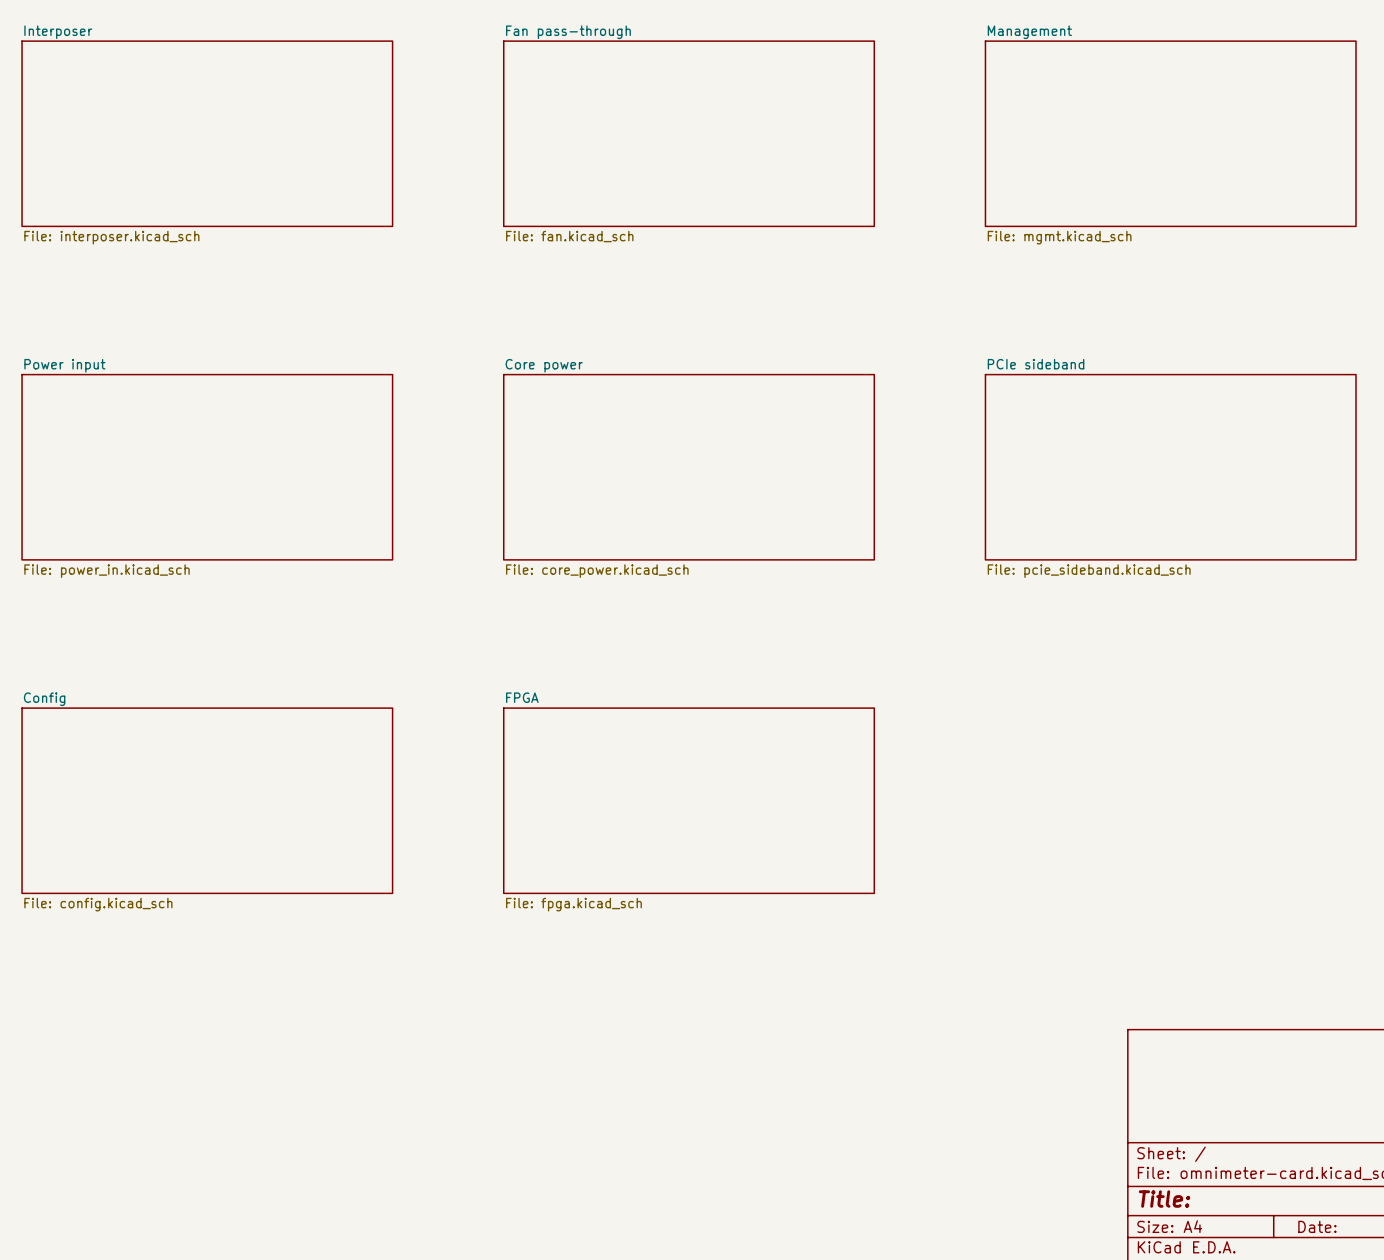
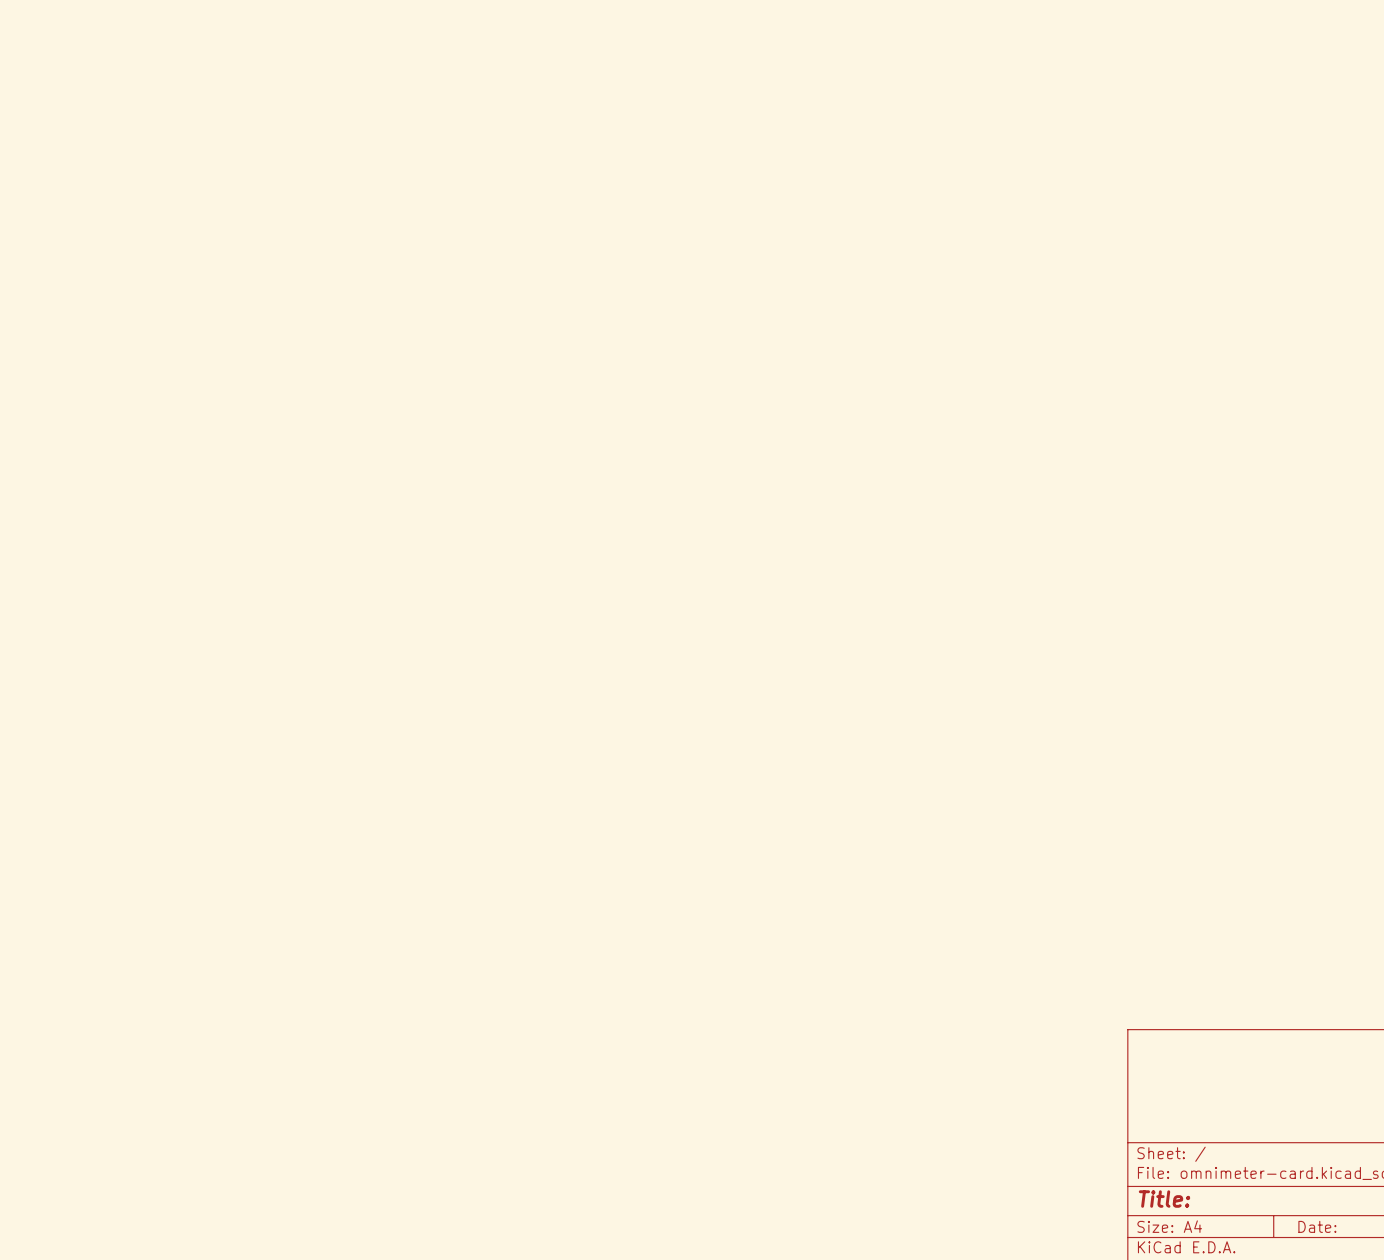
sheet Interposer: File: interposer.kicad_sch (207, 133) -> none
sheet Fan pass-through: File: fan.kicad_sch (689, 133) -> none
sheet Management: File: mgmt.kicad_sch (1170, 133) -> none
sheet Power input: File: power_in.kicad_sch (207, 467) -> none
sheet Core power: File: core_power.kicad_sch (689, 467) -> none
sheet PCIe sideband: File: pcie_sideband.kicad_sch (1170, 467) -> none
sheet Config: File: config.kicad_sch (207, 800) -> none
sheet FPGA: File: fpga.kicad_sch (689, 800) -> none

